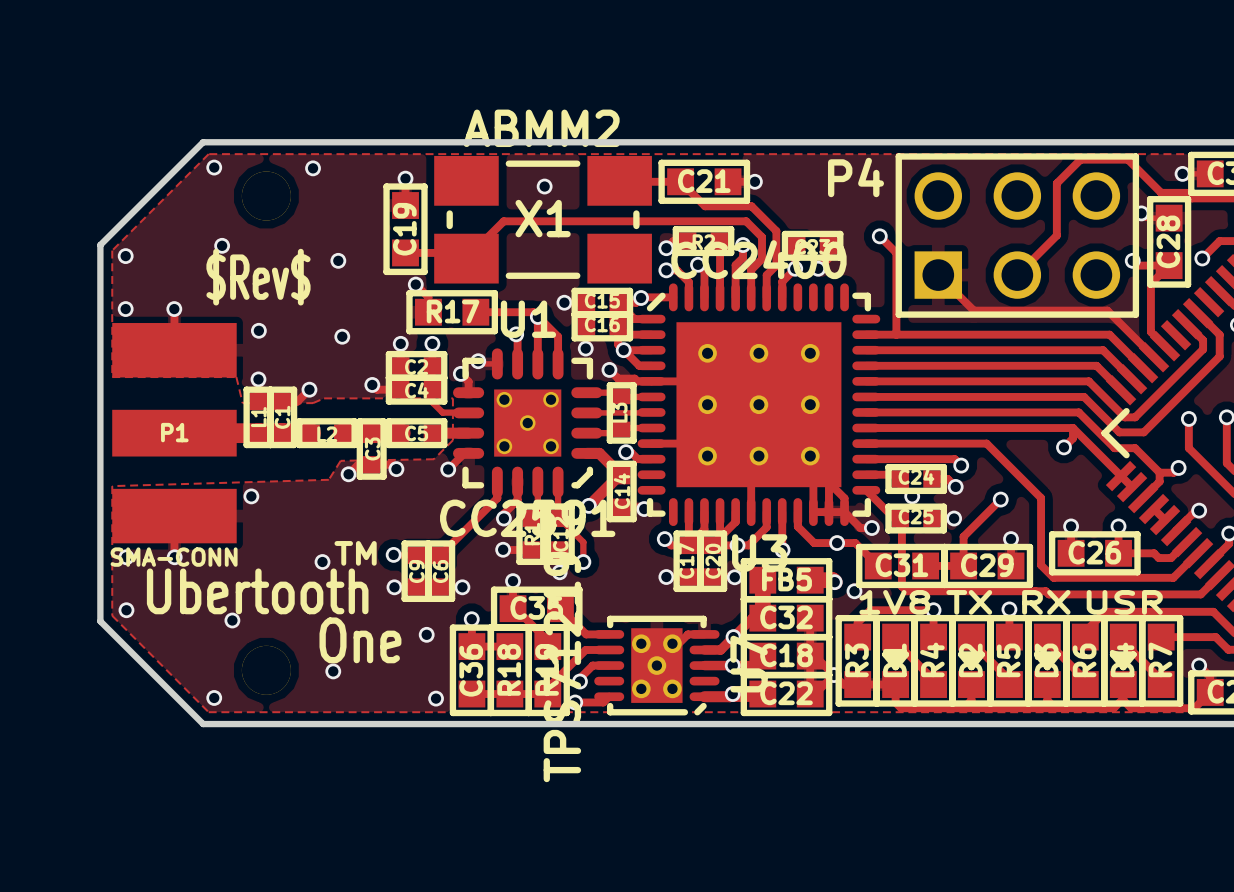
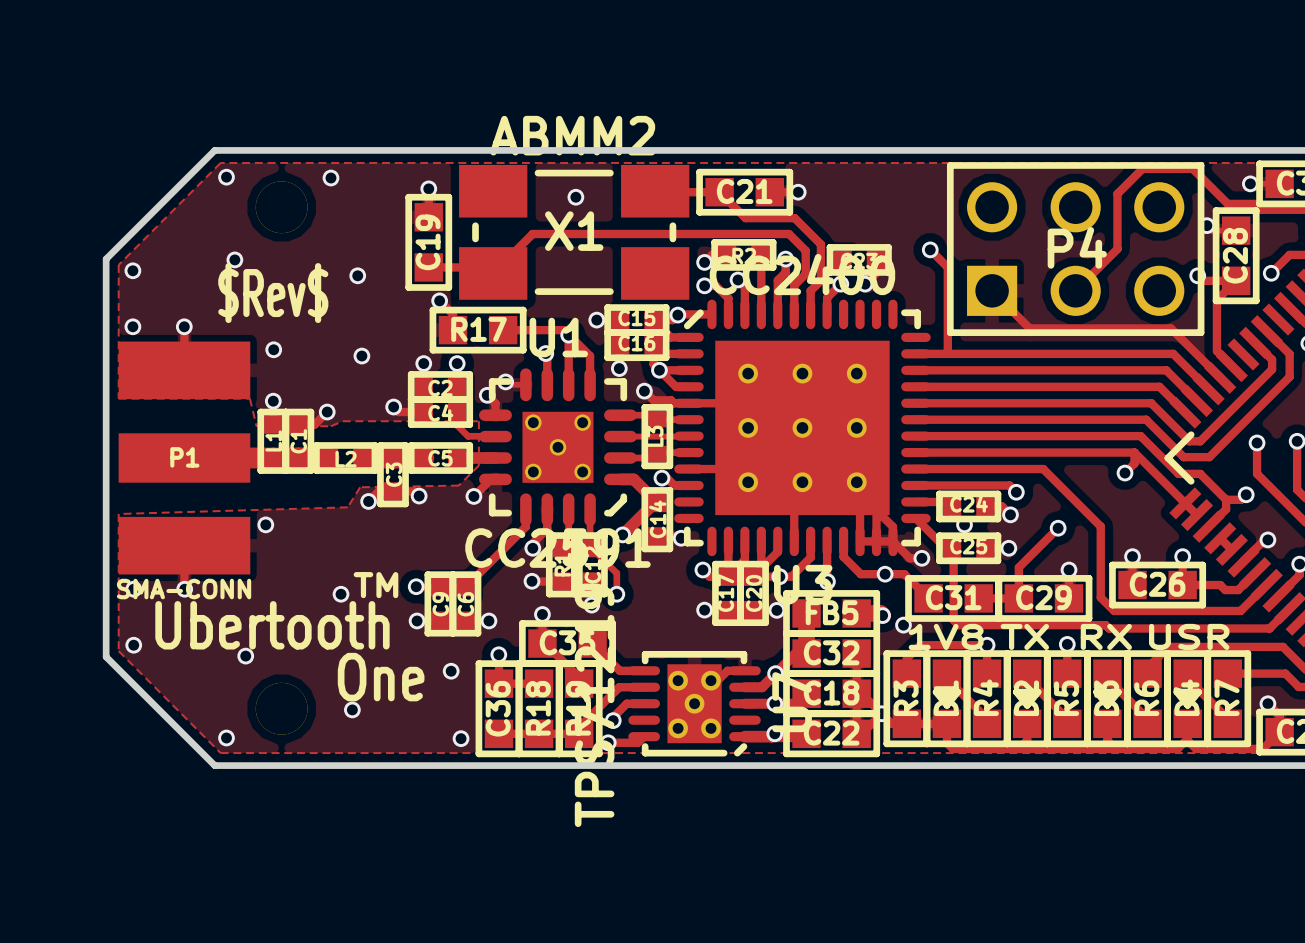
P4 name position: P4 (856, 177) -> P4 (1077, 247)

